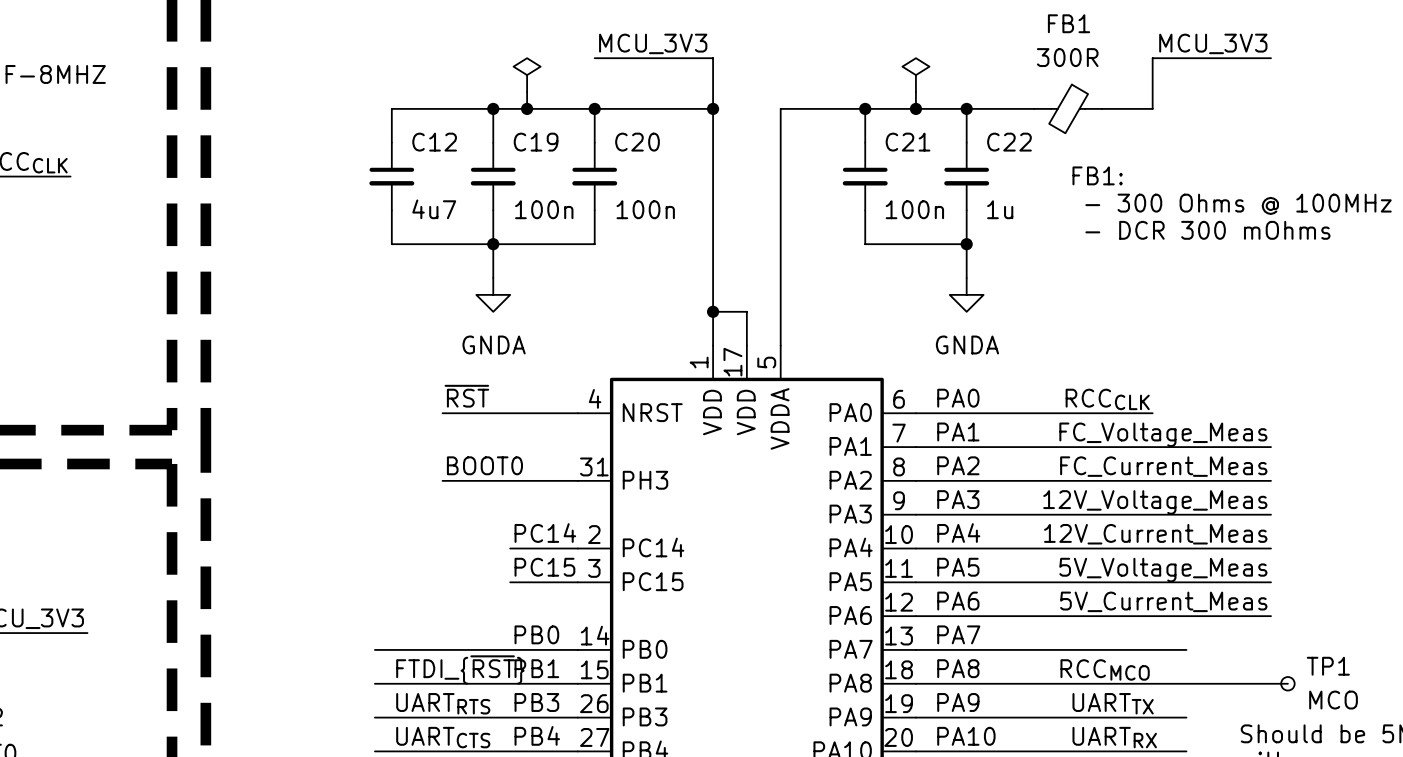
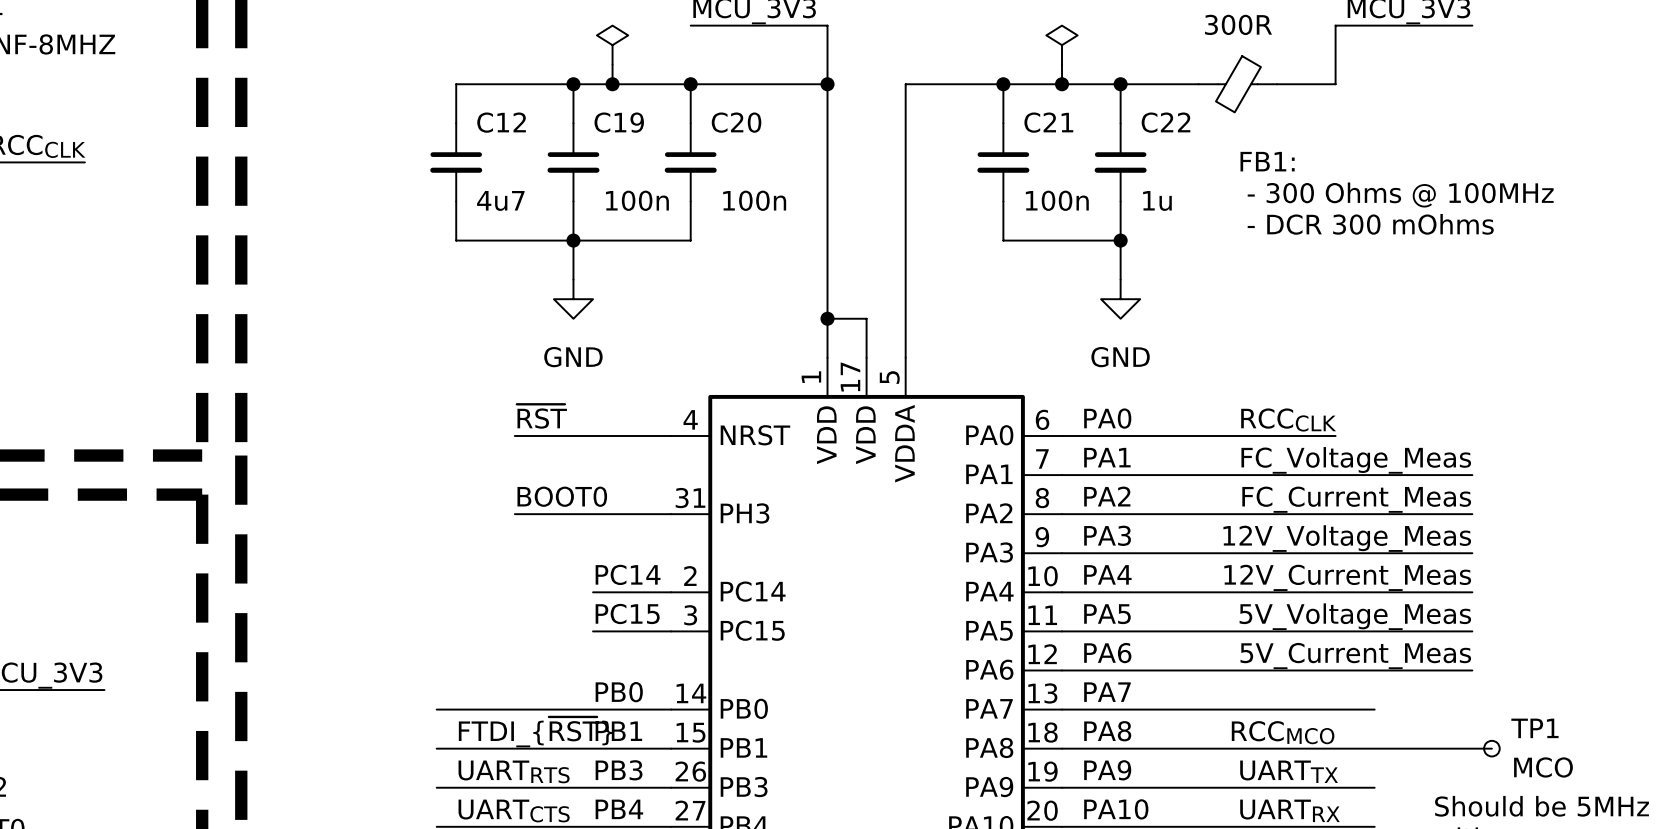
power symbol: GNDA (493, 294) -> GND (573, 299)
power symbol: GNDA (966, 294) -> GND (1120, 299)

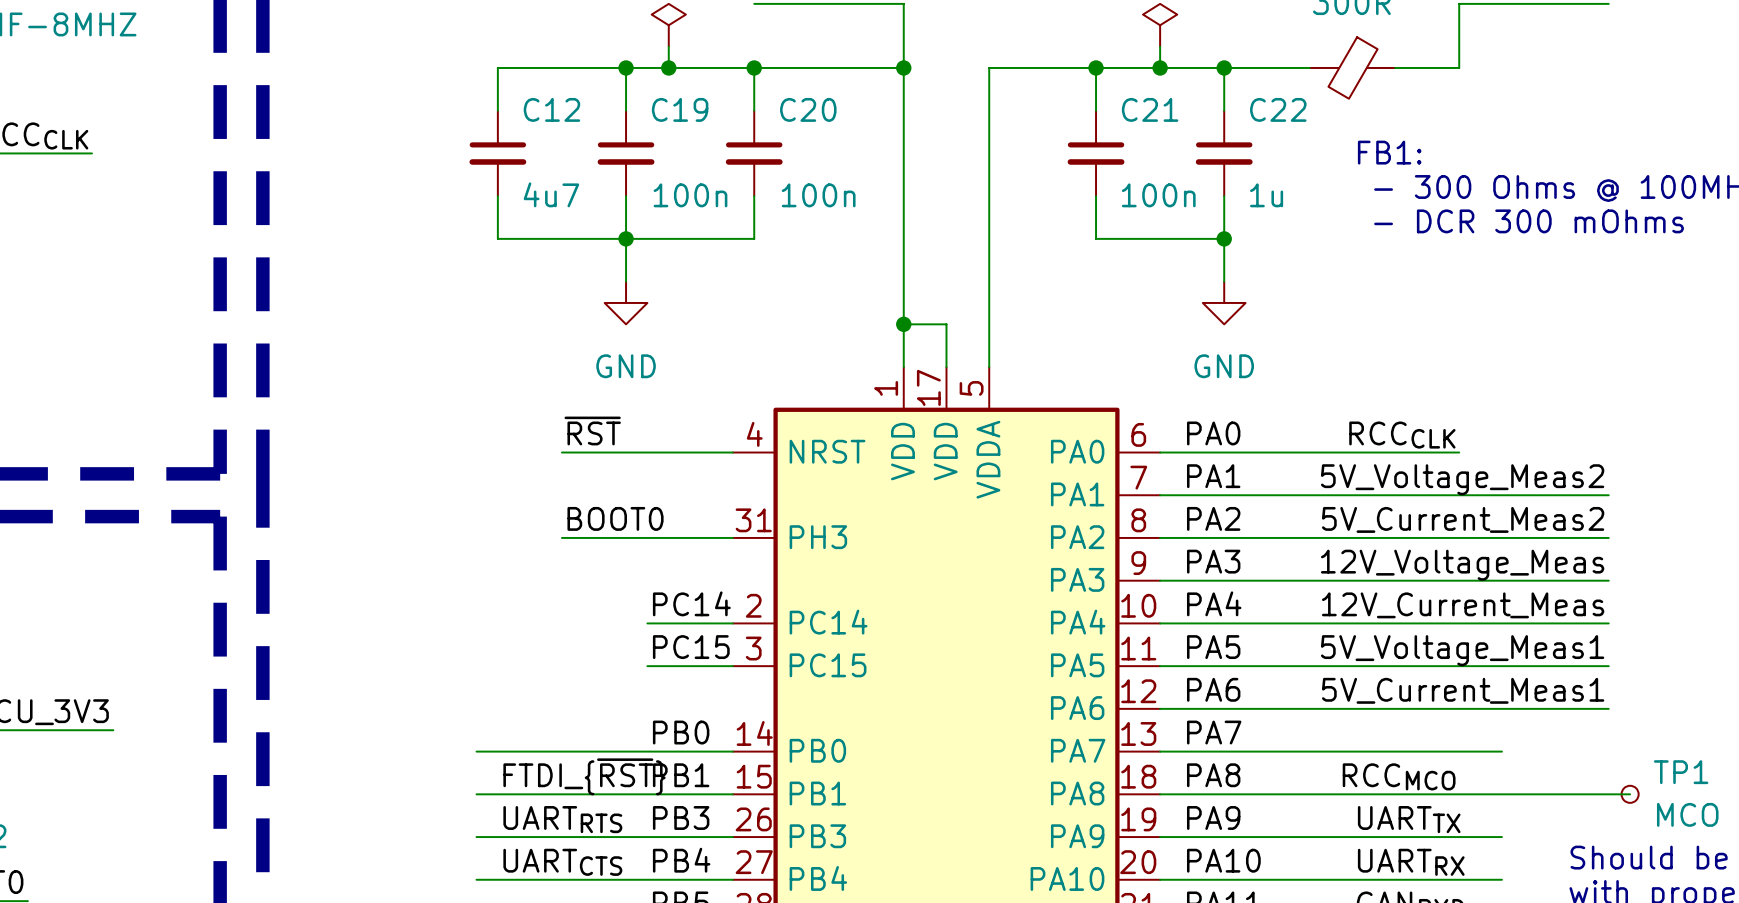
label: FC_Voltage_Meas (1356, 460) -> 5V_Voltage_Meas2 (1462, 479)
label: FC_Current_Meas (1356, 499) -> 5V_Current_Meas2 (1463, 519)
label: 5V_Voltage_Meas (1355, 616) -> 5V_Voltage_Meas1 (1462, 650)
label: 5V_Current_Meas (1355, 656) -> 5V_Current_Meas1 (1463, 690)

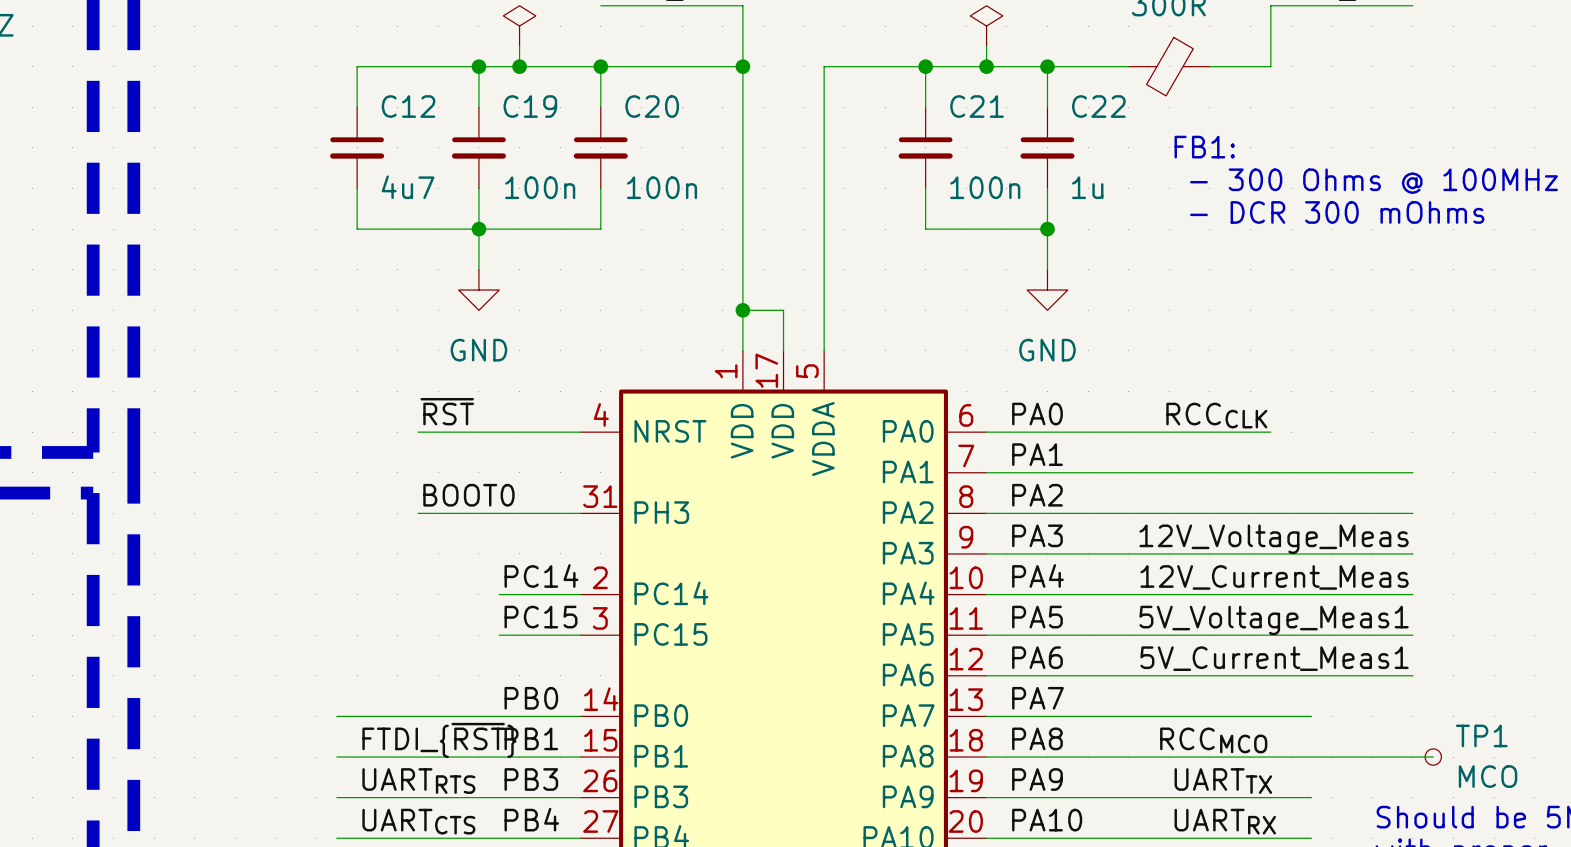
label: 5V_Voltage_Meas2 (1462, 479) -> none
label: 5V_Current_Meas2 (1463, 519) -> none

